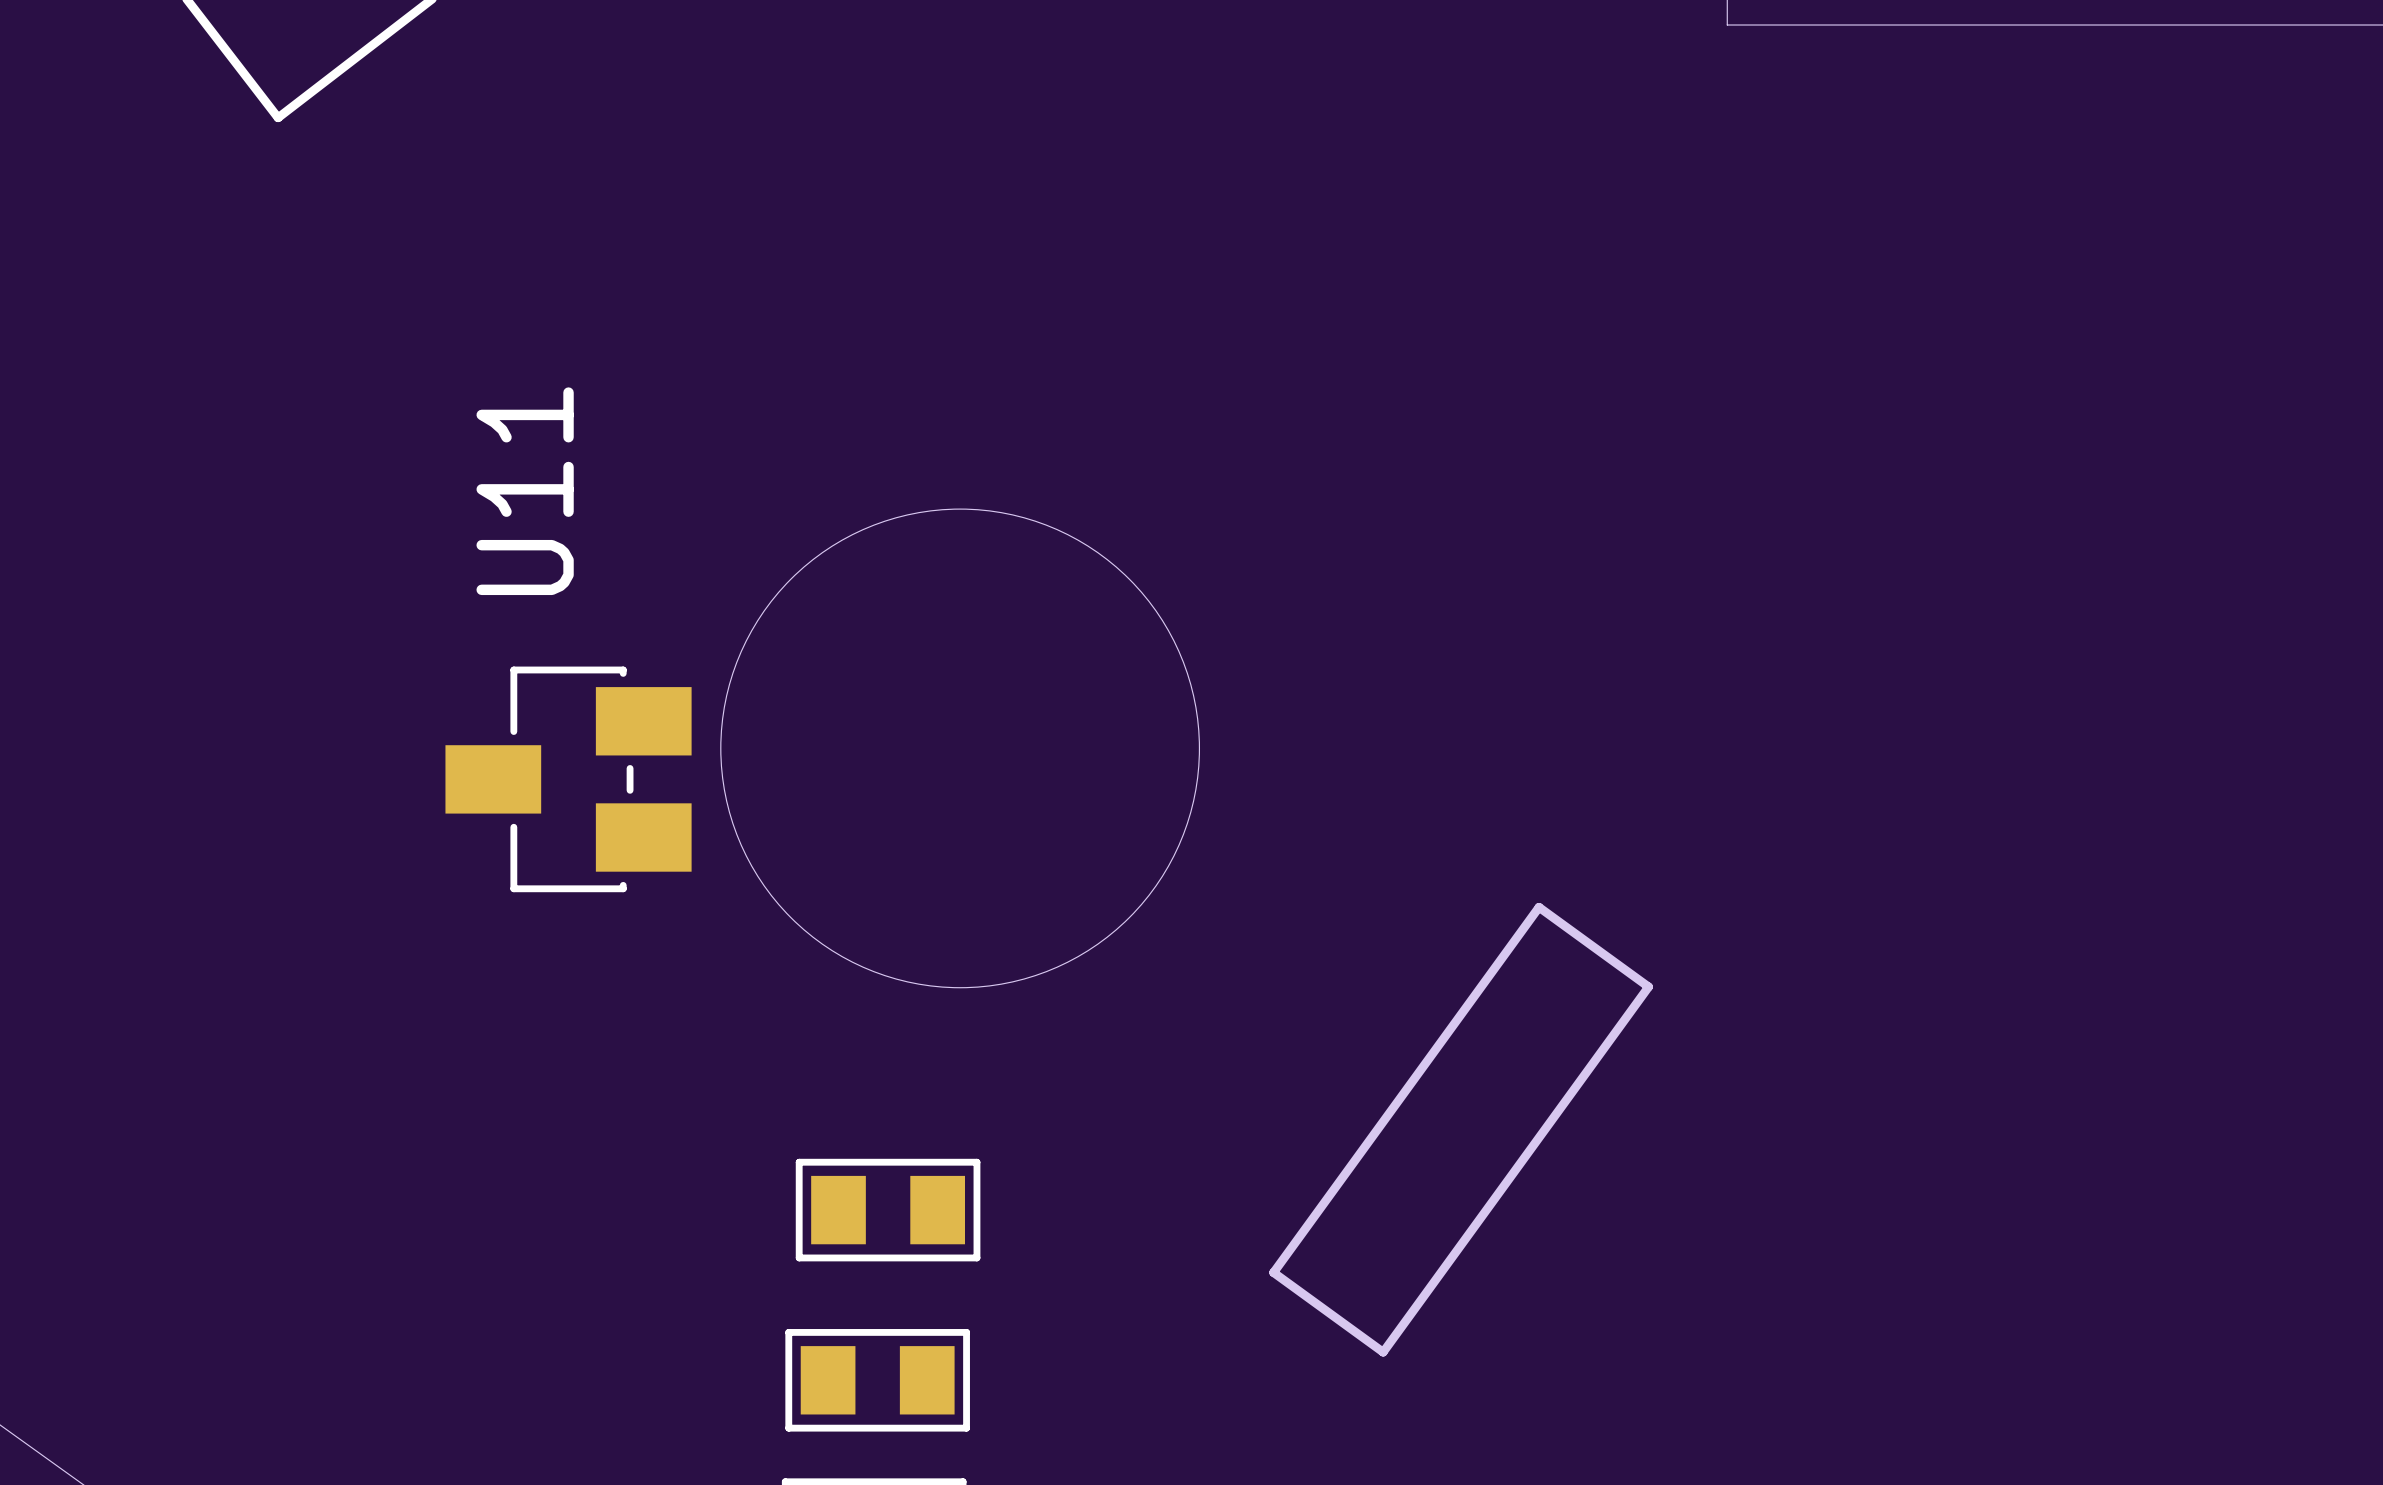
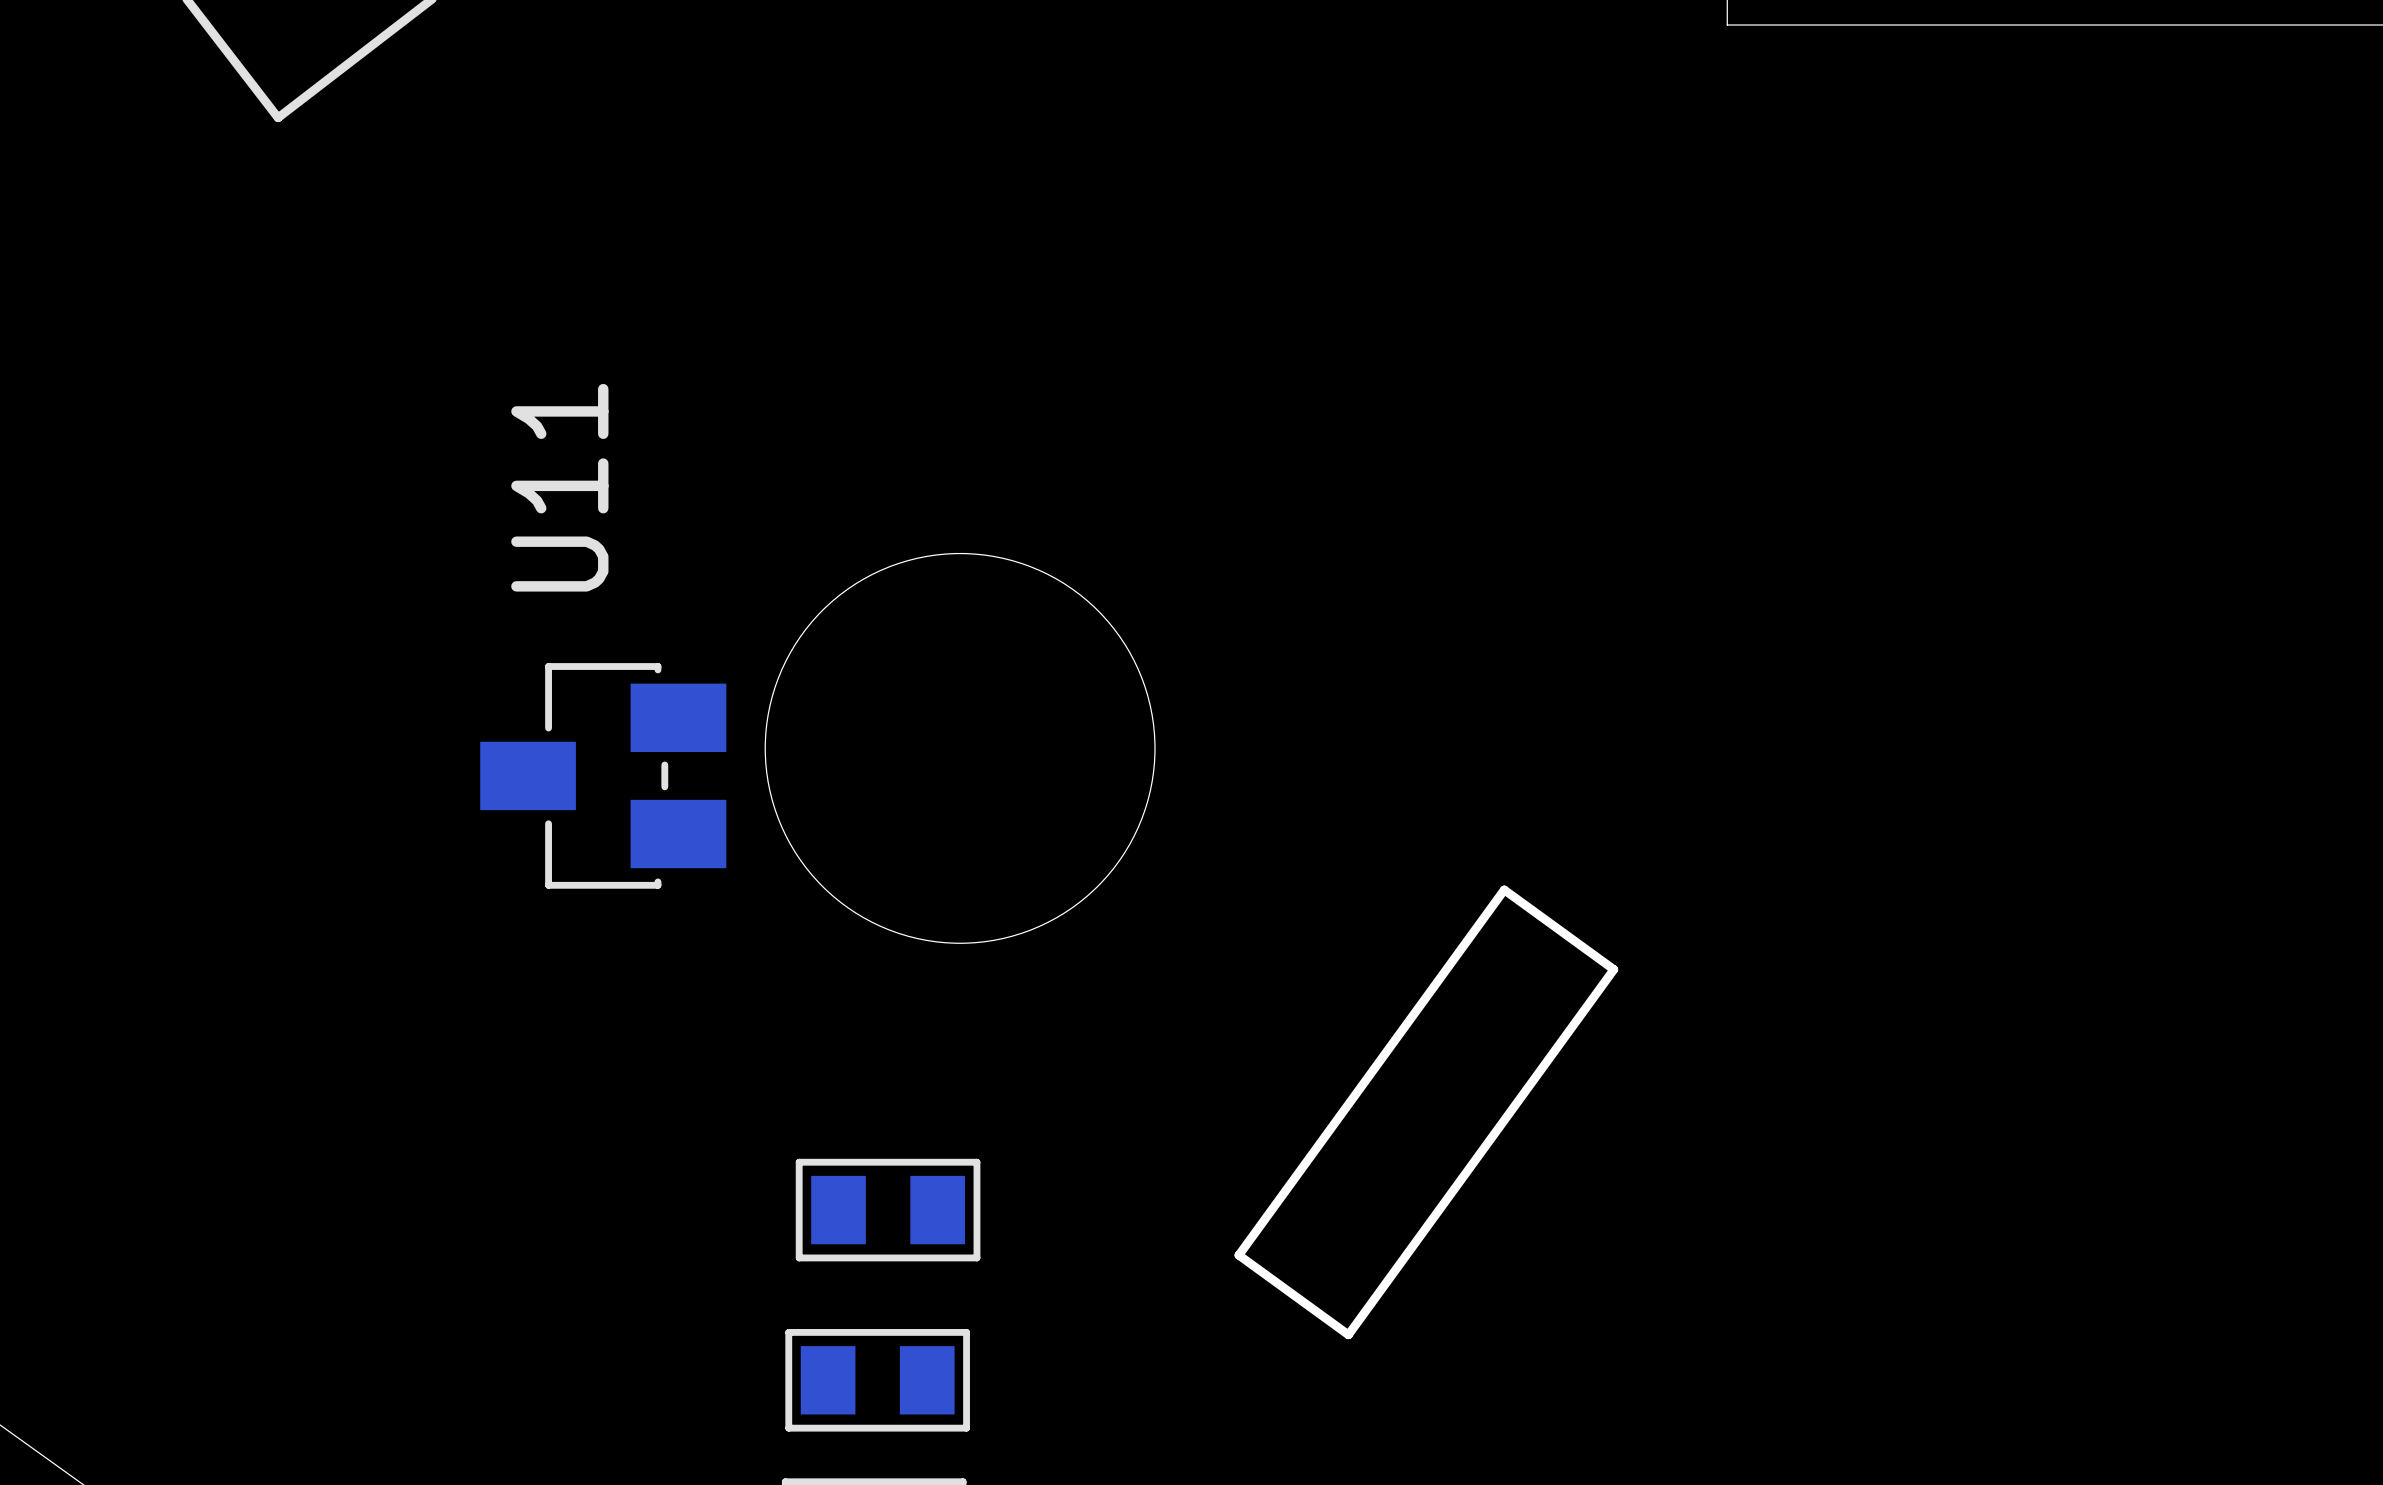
round board edge size: [720, 509, 1200, 988] -> [765, 553, 1155, 944]
U11 position: (568, 779) -> (603, 775)
part position: (1461, 1129) -> (1426, 1112)

